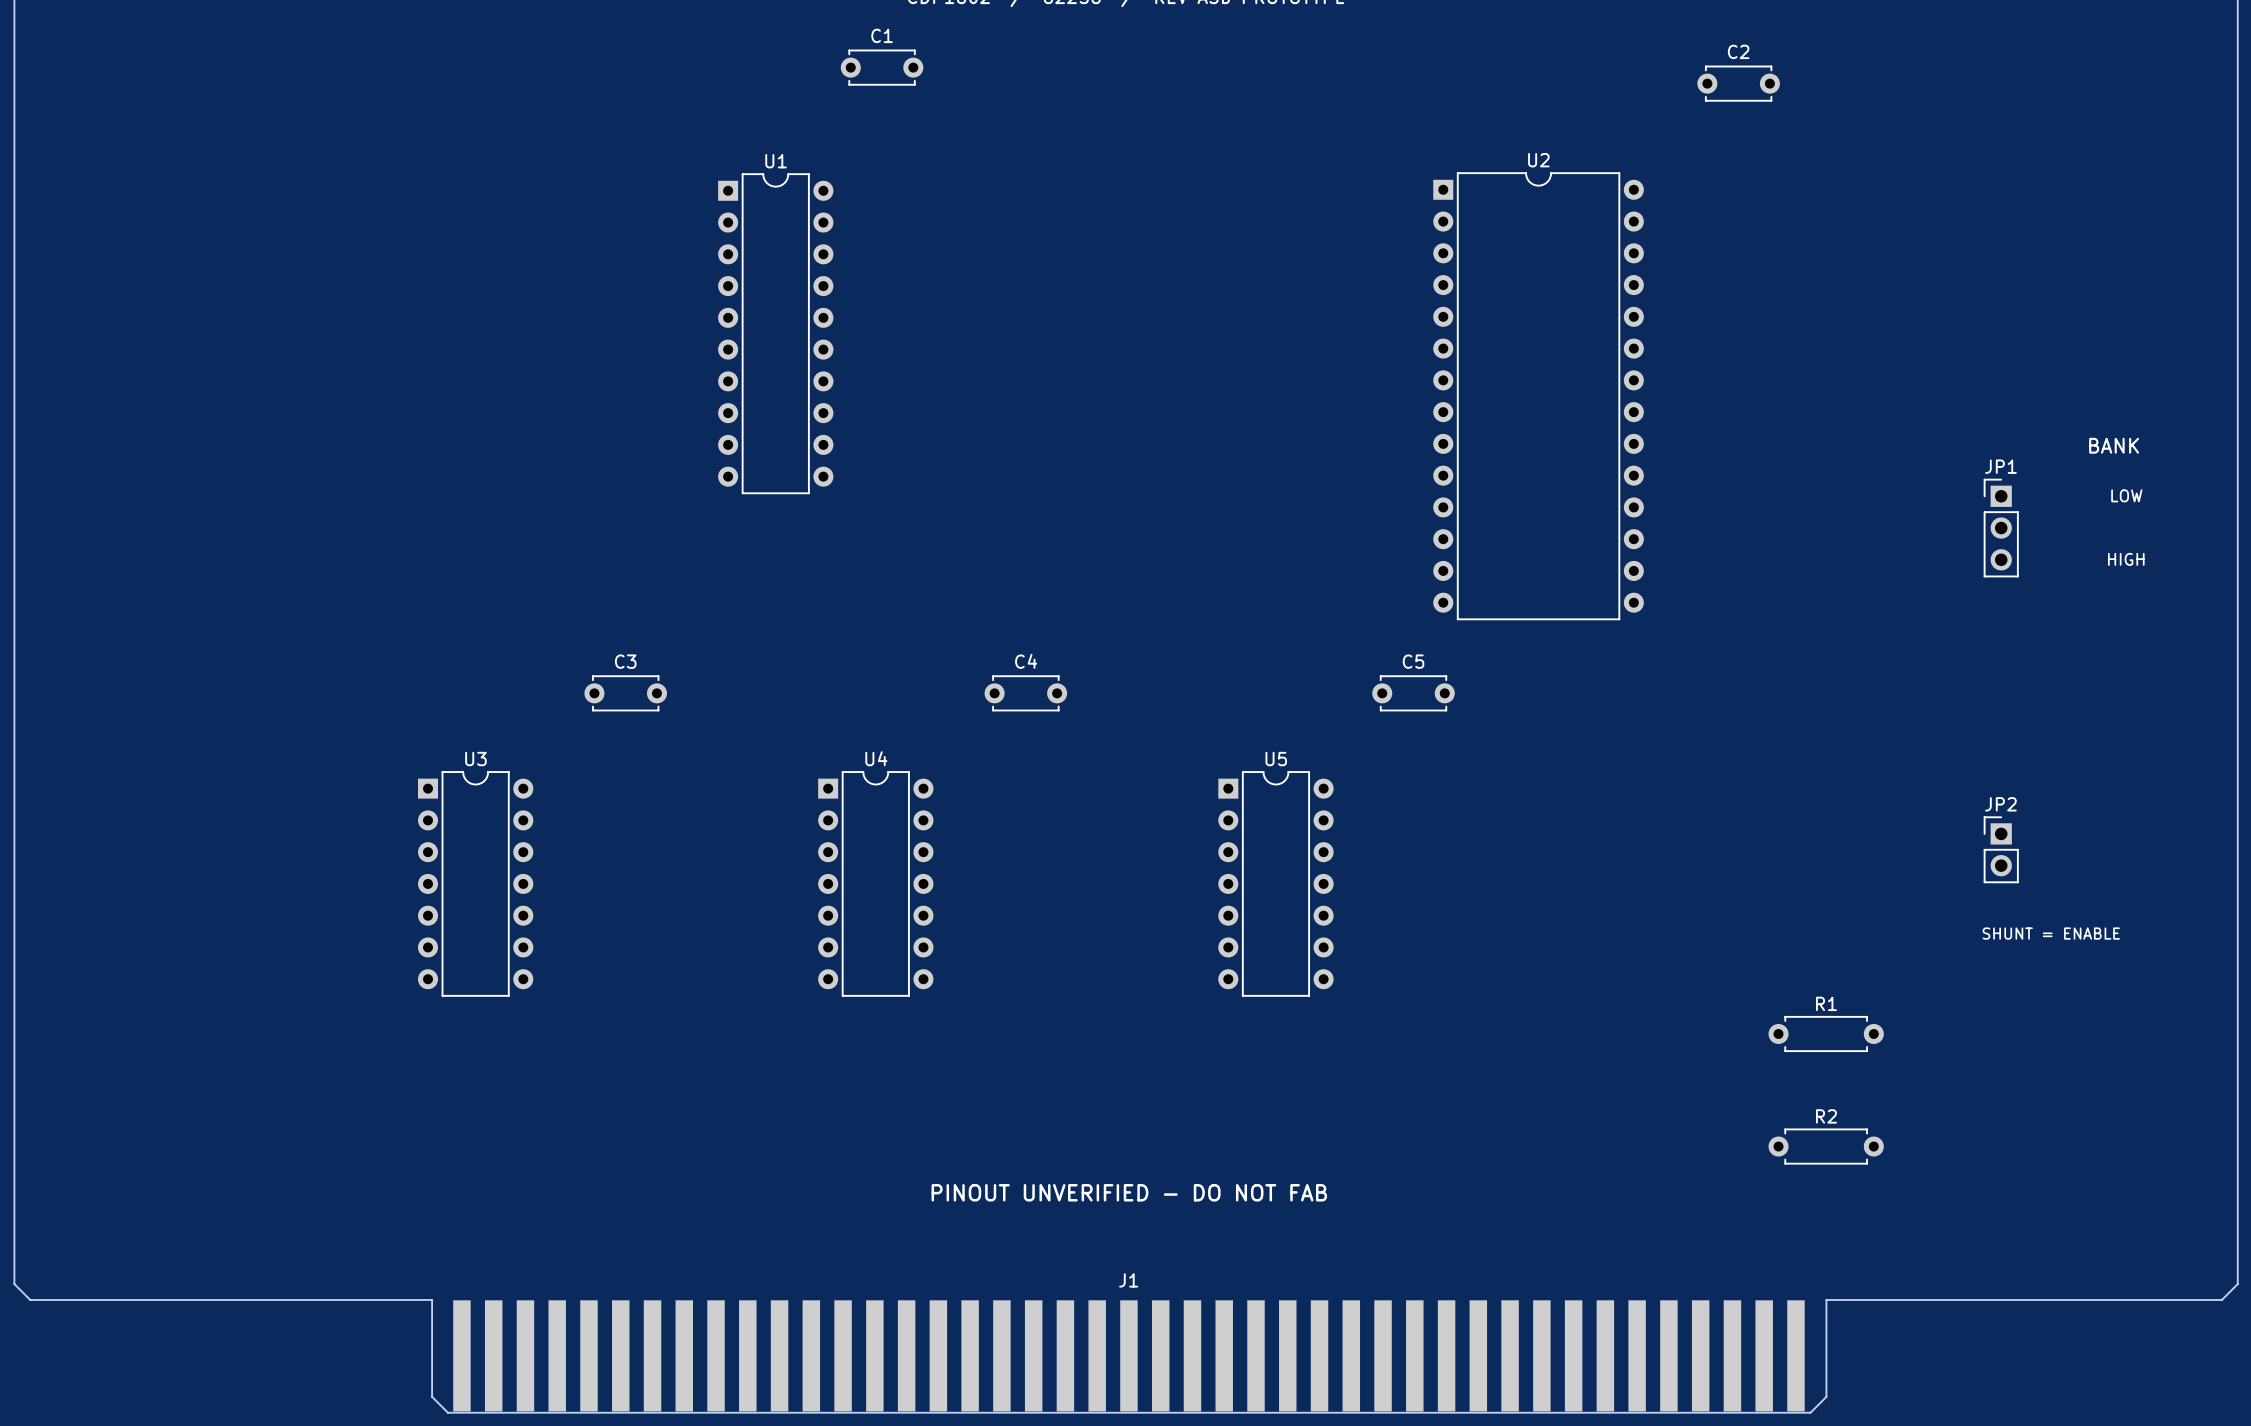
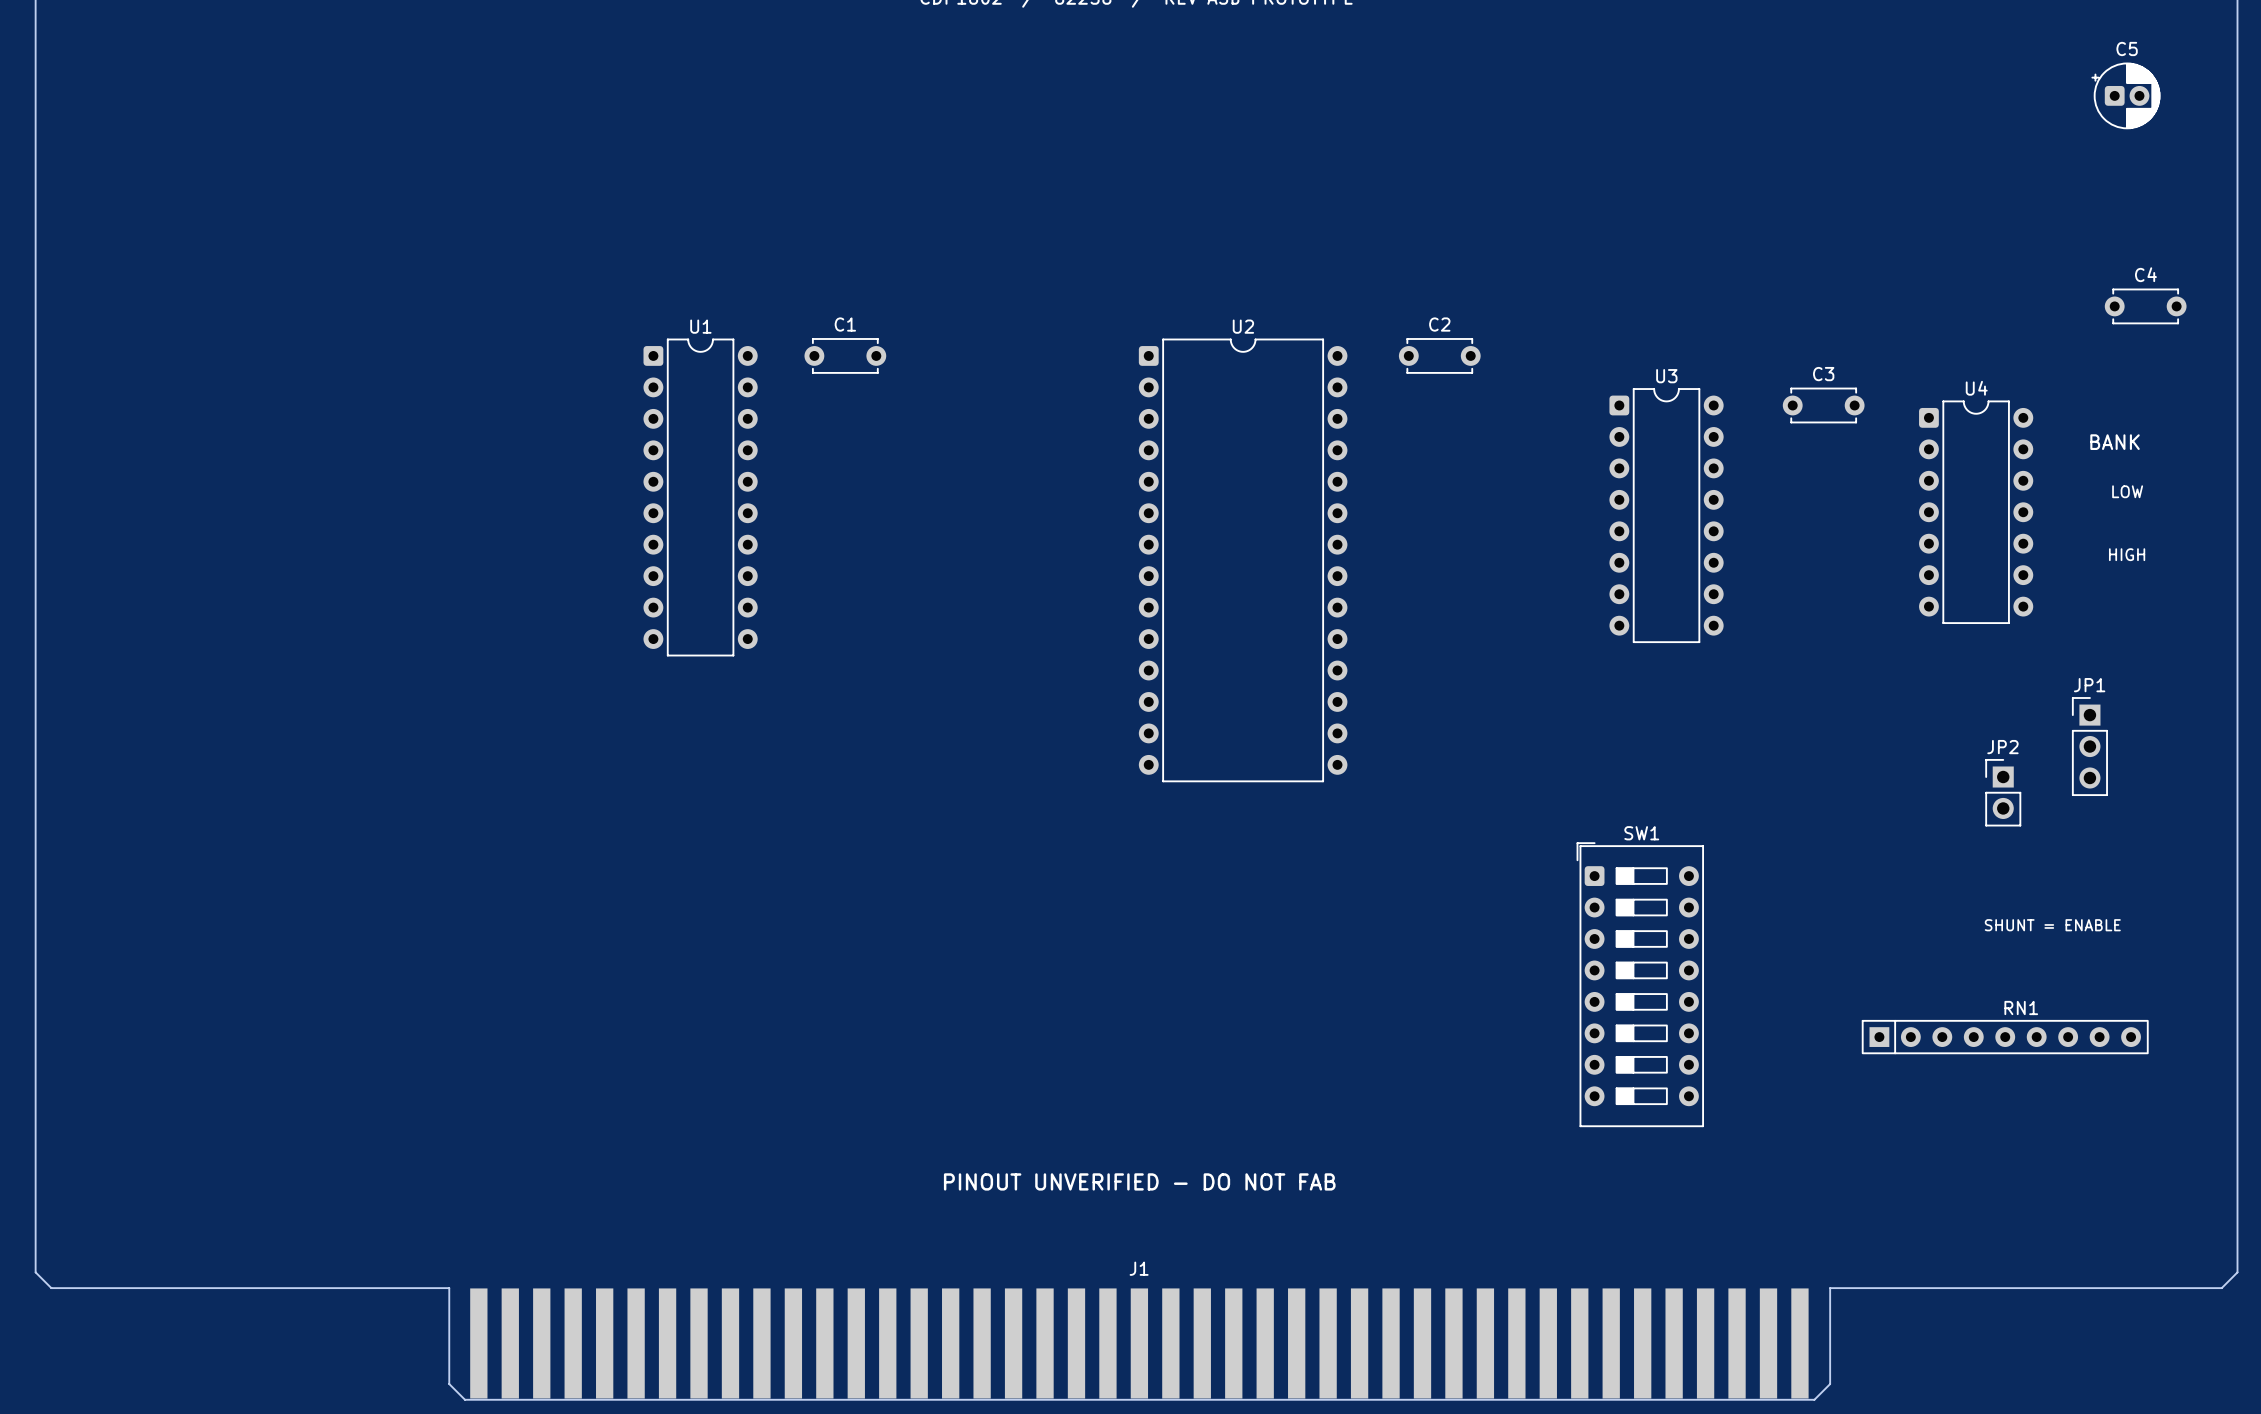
C1 footprint: [840, 49, 924, 86] -> [804, 338, 887, 374]
C2 footprint: [1697, 65, 1780, 102] -> [1398, 338, 1481, 374]
U2 footprint: [1433, 172, 1644, 621] -> [1138, 338, 1348, 783]
U1 footprint: [718, 173, 834, 495] -> [643, 338, 758, 657]
JP1 footprint: [1983, 478, 2019, 578] -> [2072, 697, 2108, 796]
C3 footprint: [584, 675, 667, 712] -> [1782, 387, 1865, 424]
C4 footprint: [984, 675, 1068, 712] -> [2104, 288, 2187, 325]
C5 footprint: [1372, 675, 1455, 712] -> [2091, 62, 2161, 130]
U3 footprint: [418, 771, 534, 997] -> [1609, 388, 1724, 643]
U4 footprint: [818, 771, 934, 997] -> [1919, 400, 2034, 624]
JP2 footprint: [1983, 816, 2019, 884] -> [1985, 759, 2022, 827]
U5: (1275, 883) -> none
SW1: none -> (1640, 984)
R1: (1826, 1033) -> none
RN1: none -> (2005, 1037)
R2: (1826, 1146) -> none

